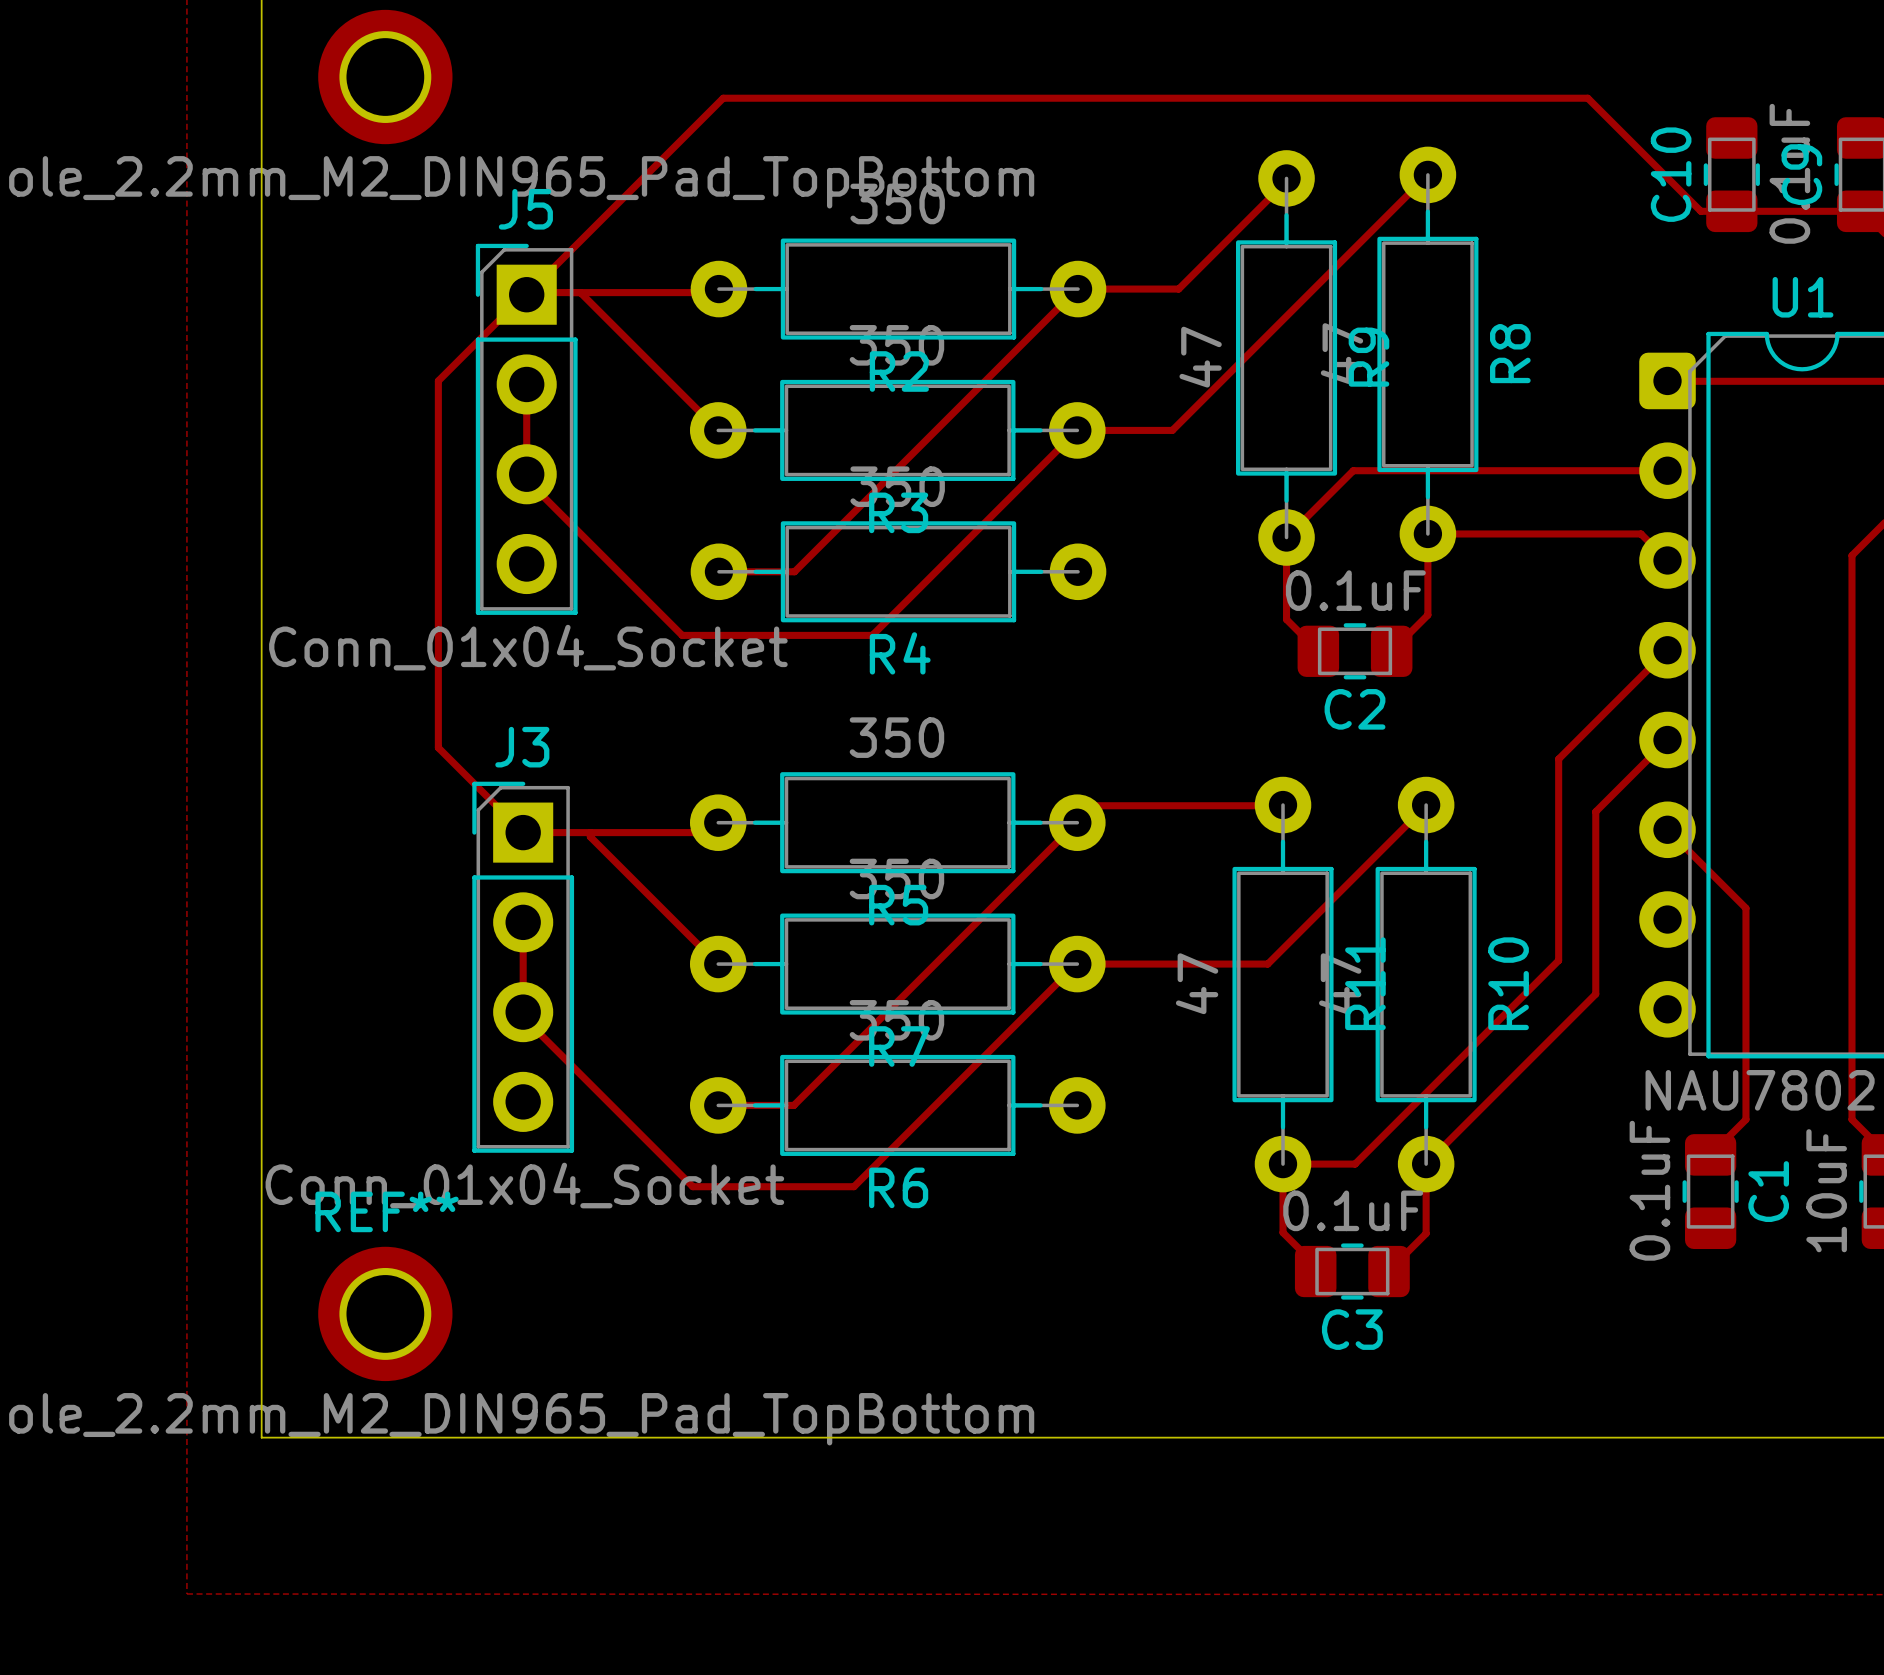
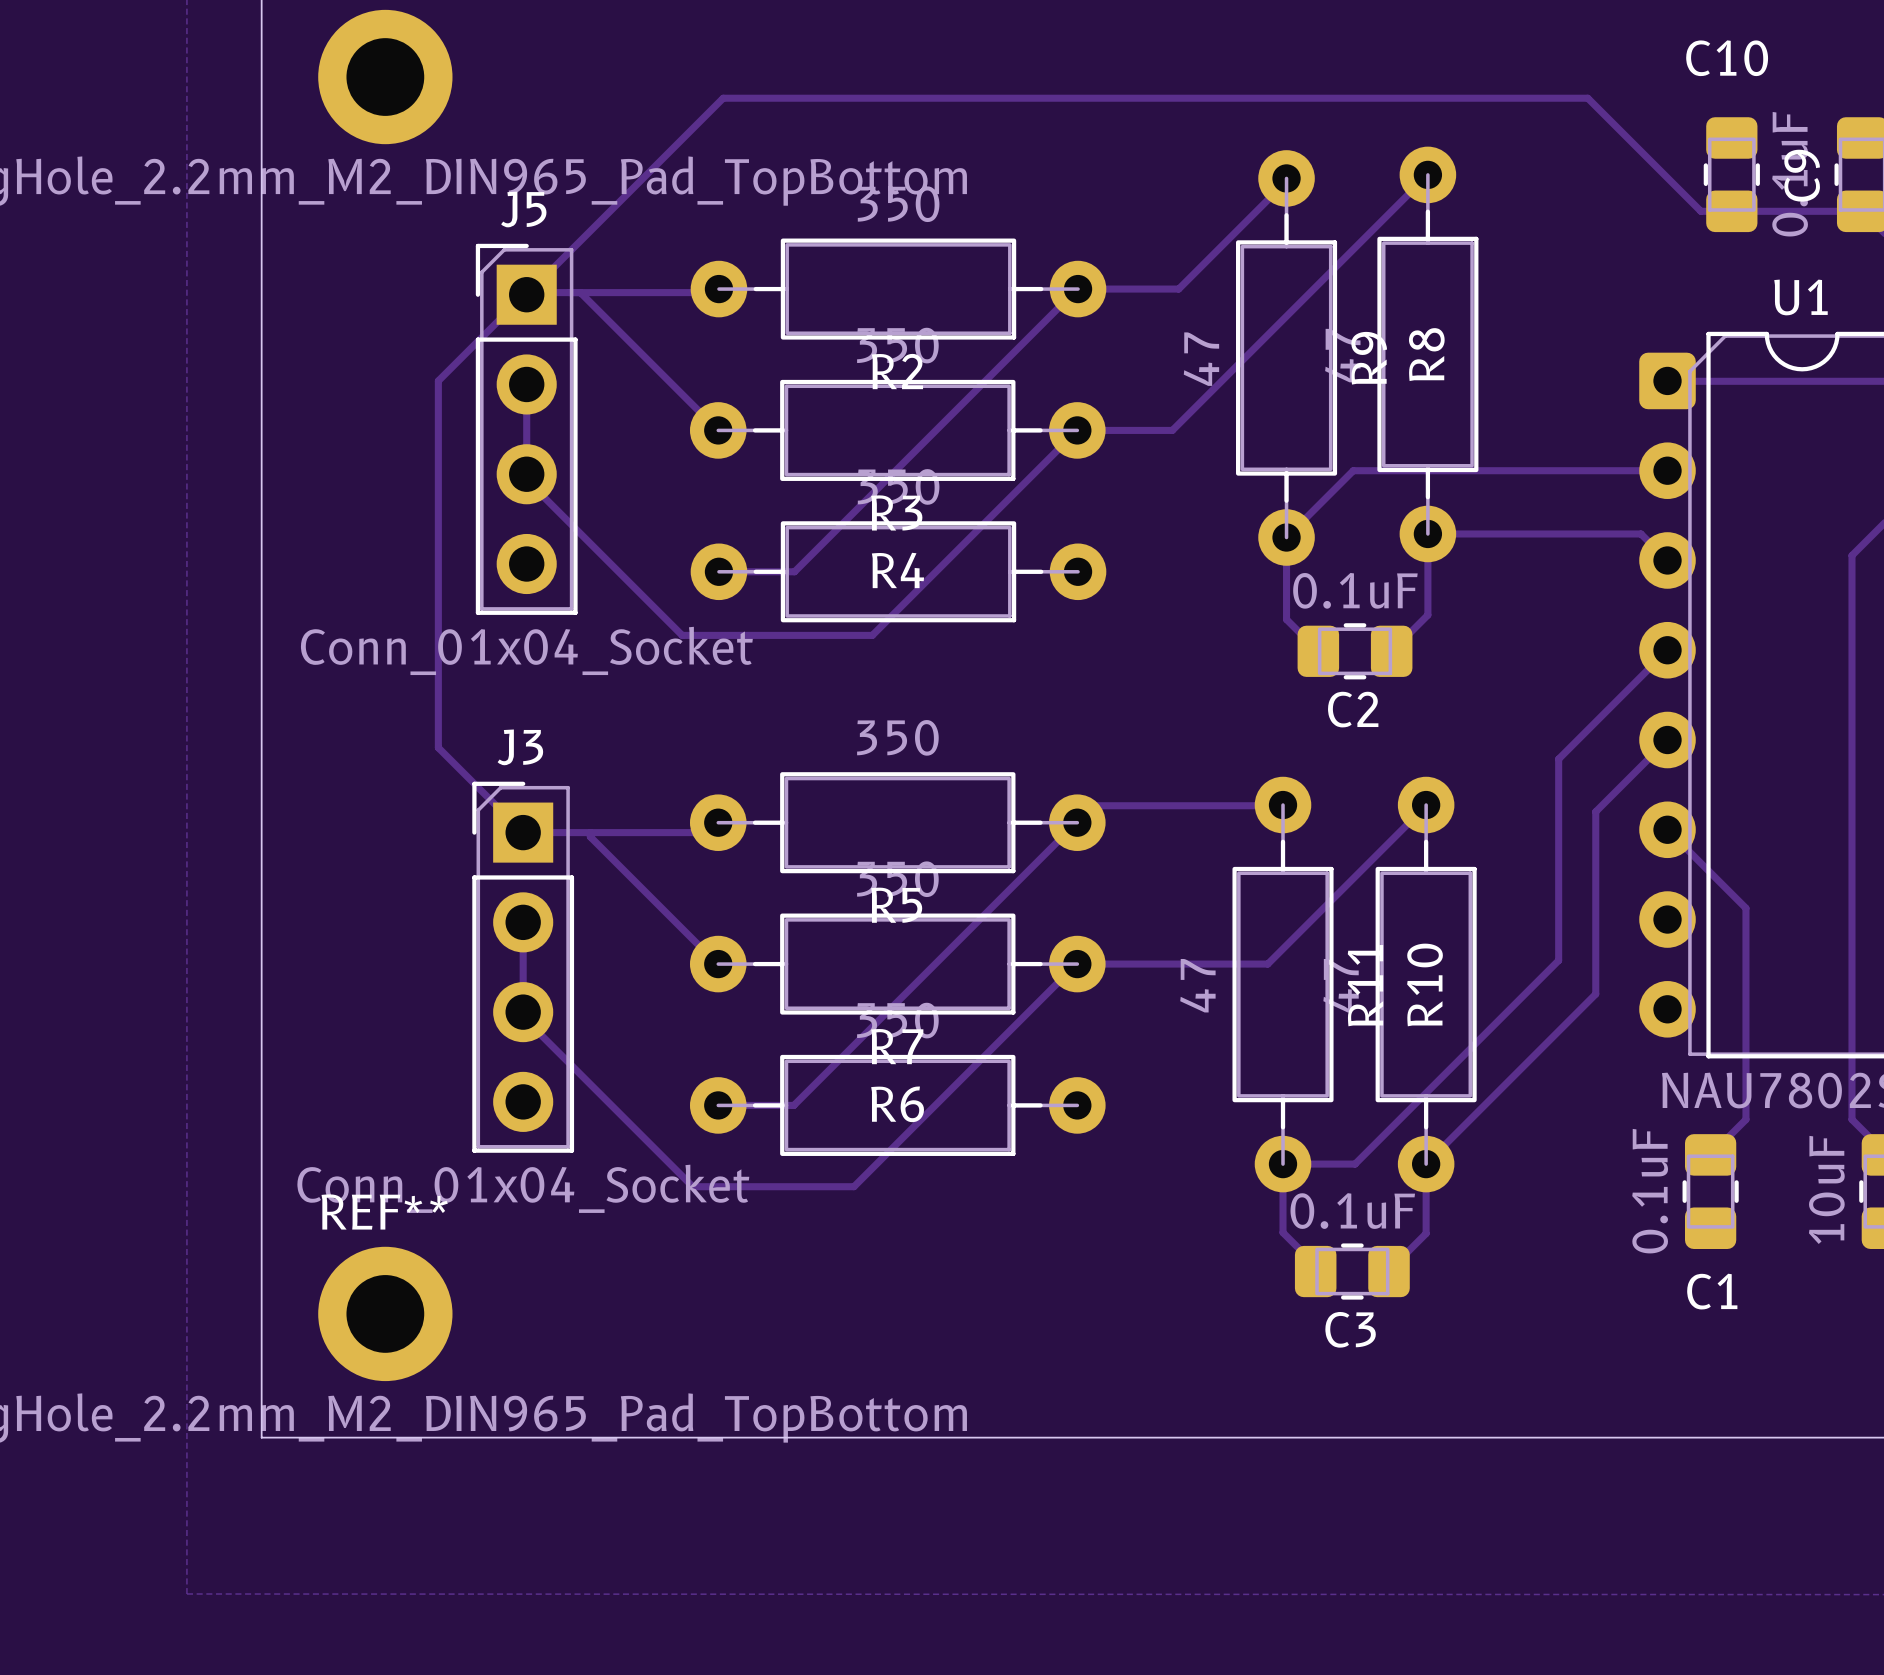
C10 name rotation: 0° (1671, 174) -> 90° clockwise (1727, 58)
C10 name position: C10 (1671, 174) -> C10 (1727, 58)
R8 name position: R8 (1510, 353) -> R8 (1426, 354)
R4 name position: R4 (900, 653) -> R4 (897, 570)
R10 name position: R10 (1508, 983) -> R10 (1425, 984)
R6 name position: R6 (898, 1187) -> R6 (897, 1104)
C1 name rotation: 0° (1768, 1191) -> 90° clockwise (1712, 1291)
C1 name position: C1 (1768, 1191) -> C1 (1712, 1291)

